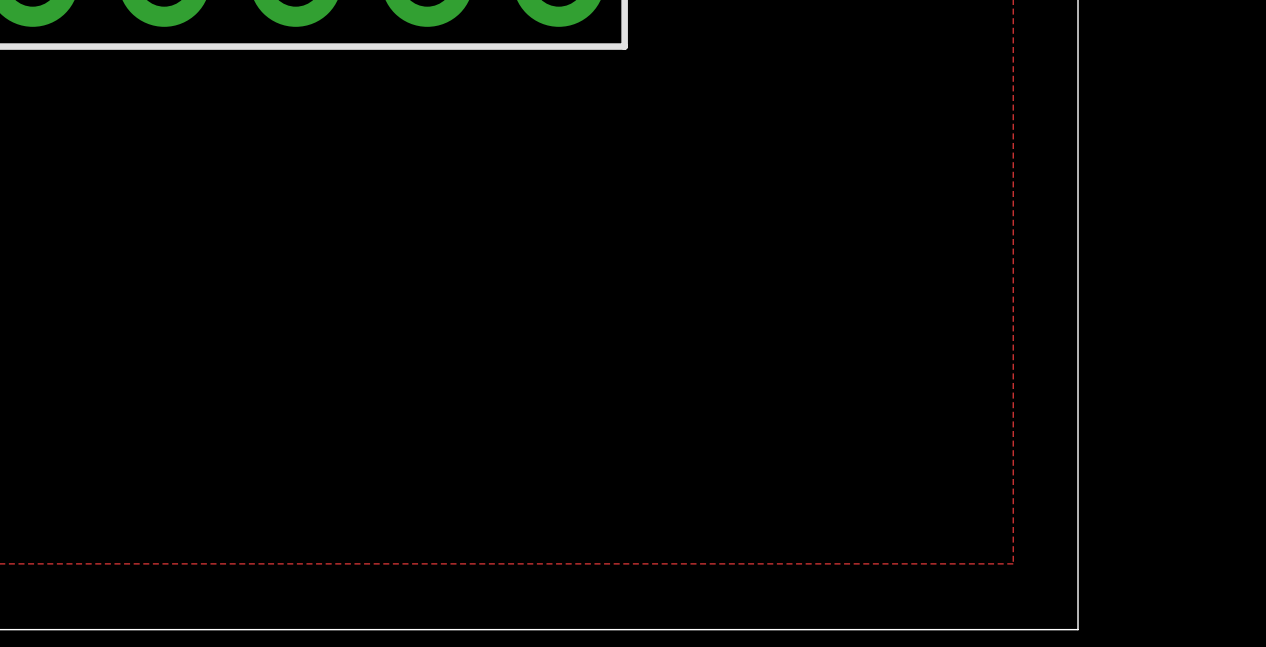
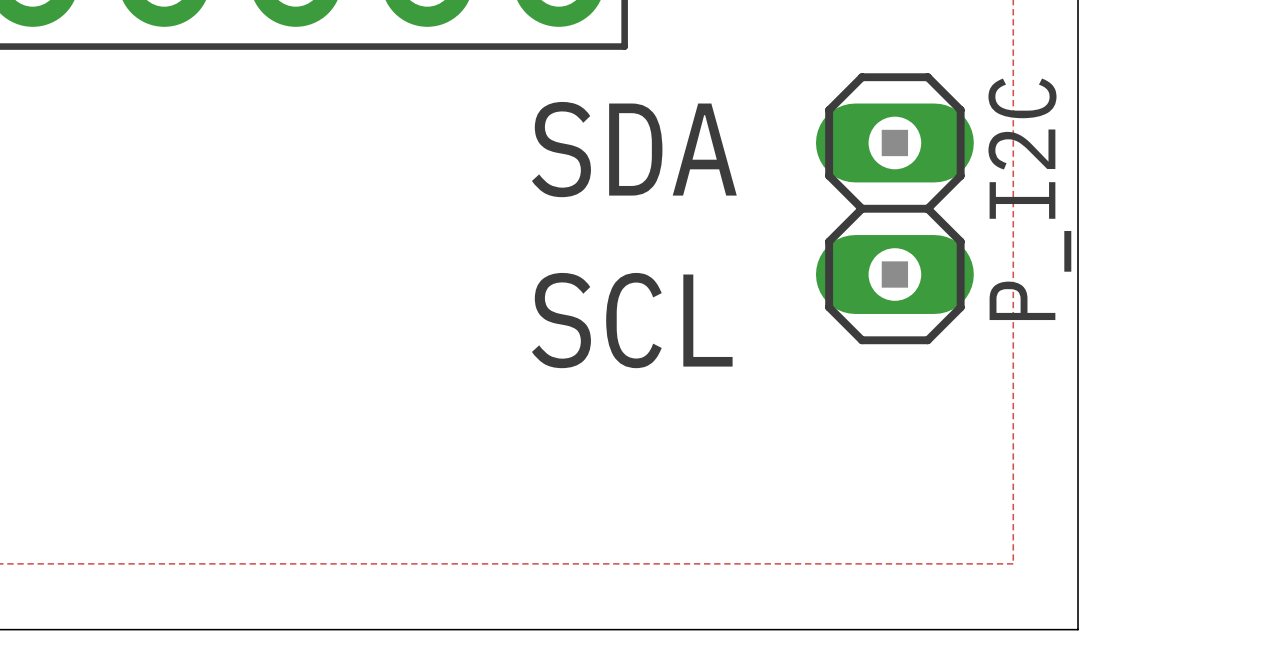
text: none -> SDA (634, 149)
P_I2C: none -> (894, 208)
text: none -> SCL (632, 320)

